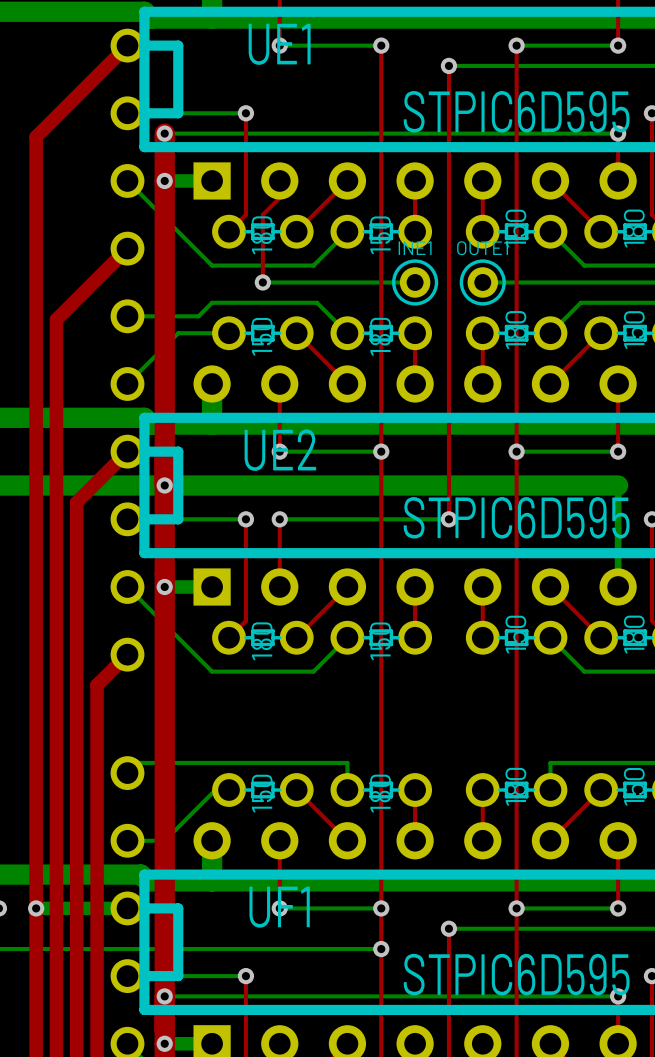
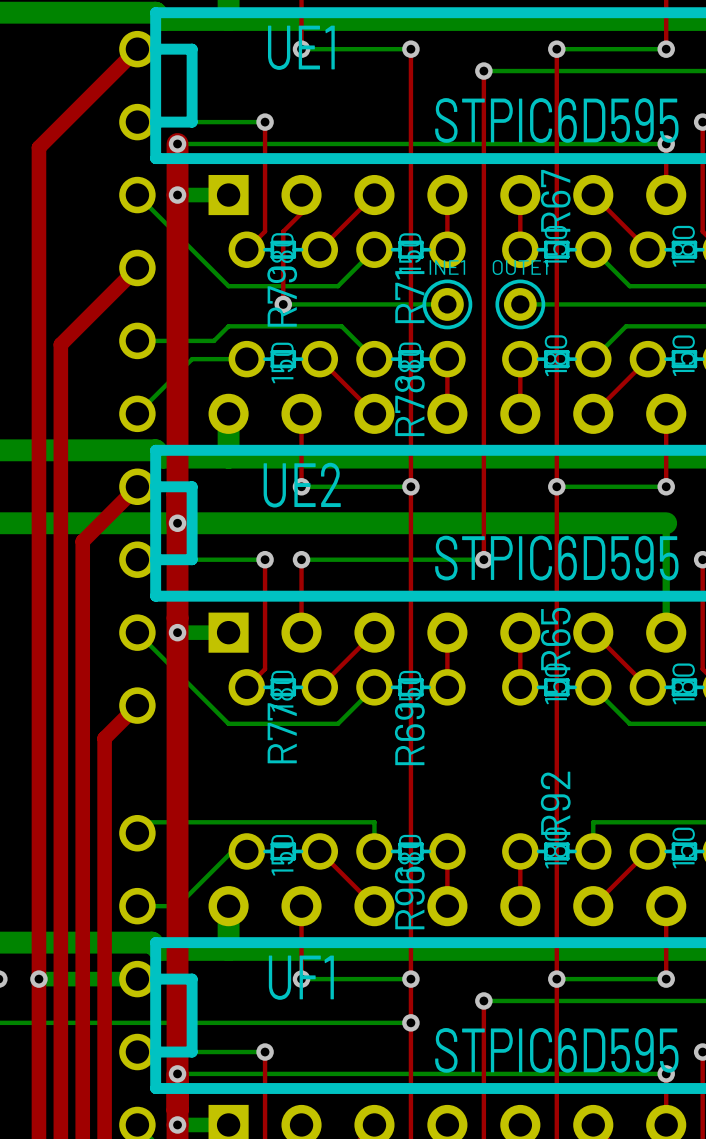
R67 name: none -> R67 (555, 200)
R79 name: none -> R79 (282, 296)
R71 name: none -> R71 (409, 297)
R78 name: none -> R78 (409, 405)
R65 name: none -> R65 (555, 639)
R77 name: none -> R77 (282, 733)
R69 name: none -> R69 (409, 734)
R92 name: none -> R92 (555, 803)
R96 name: none -> R96 (409, 897)

